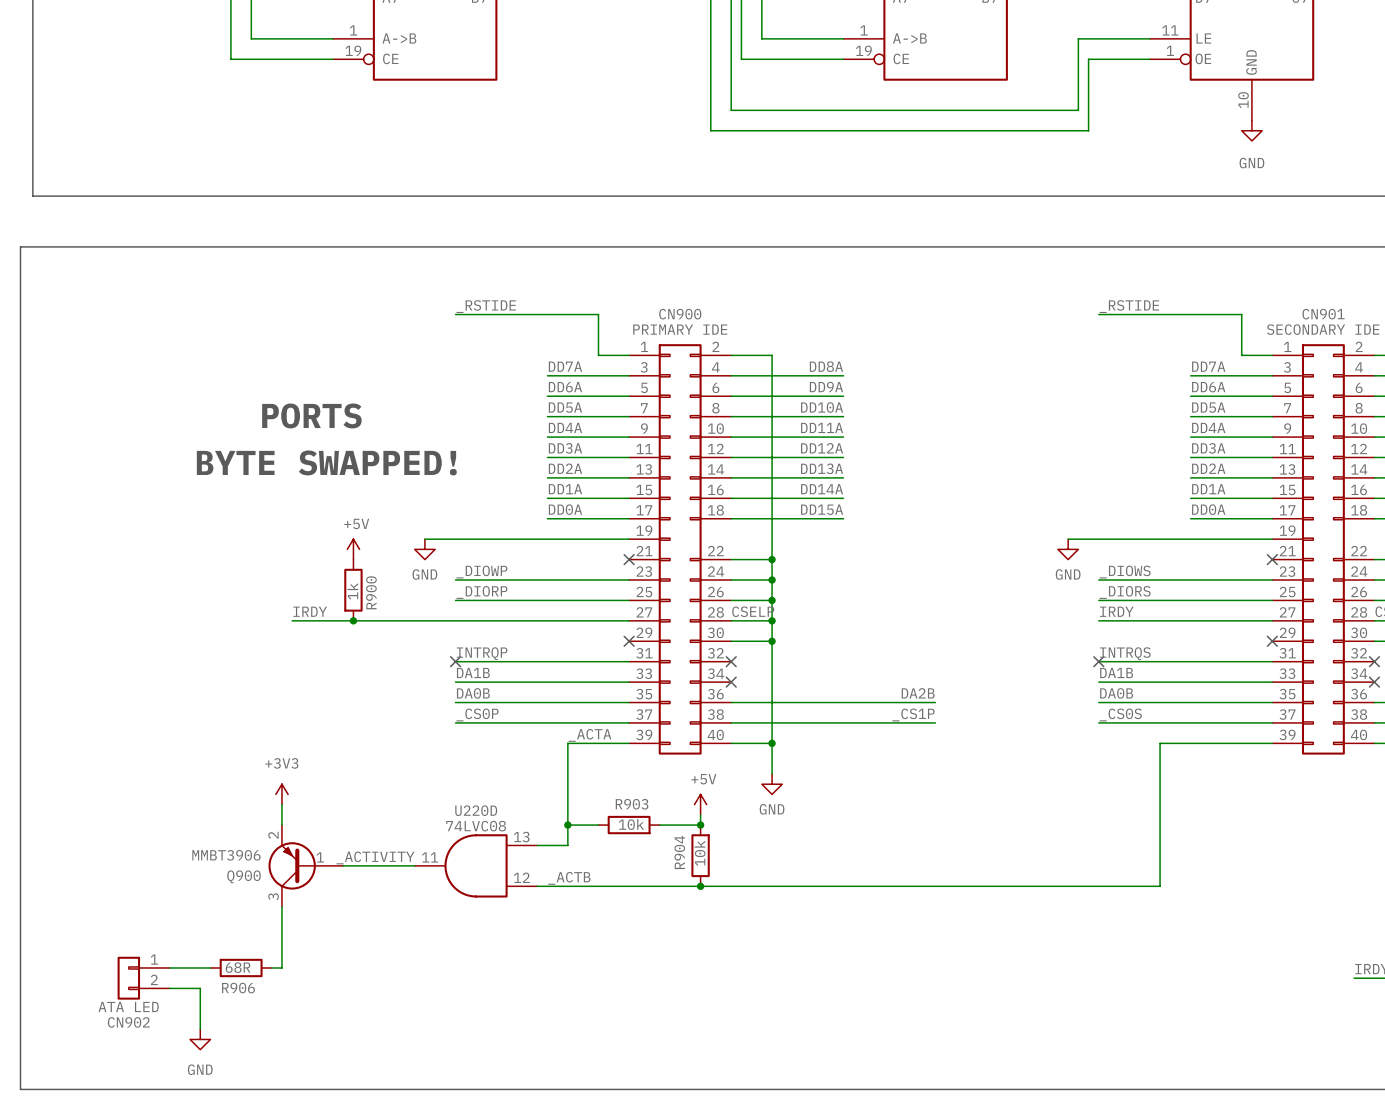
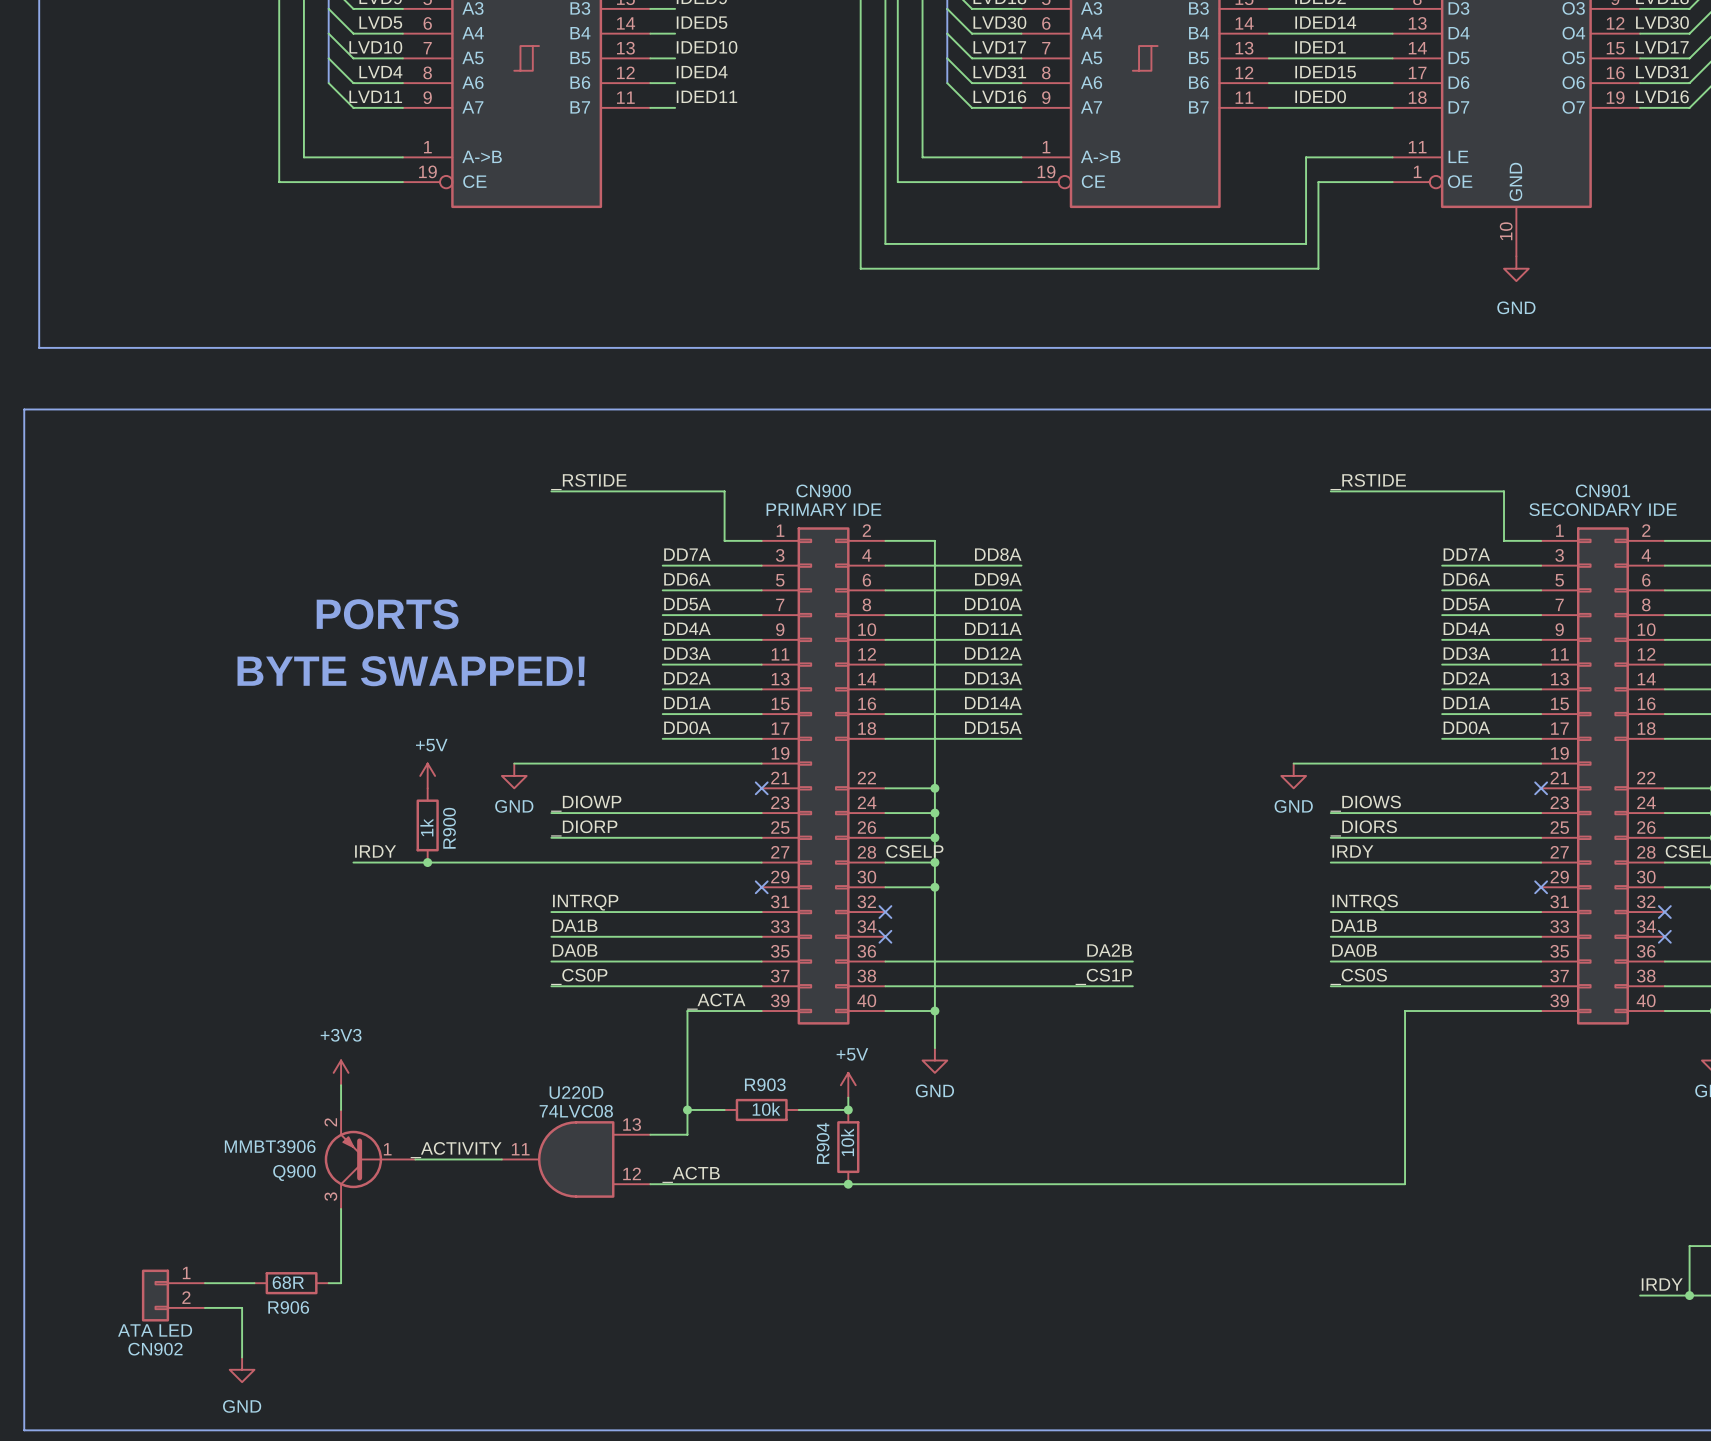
no-connect mark: (455, 661) -> none
no-connect mark: (1098, 661) -> none

